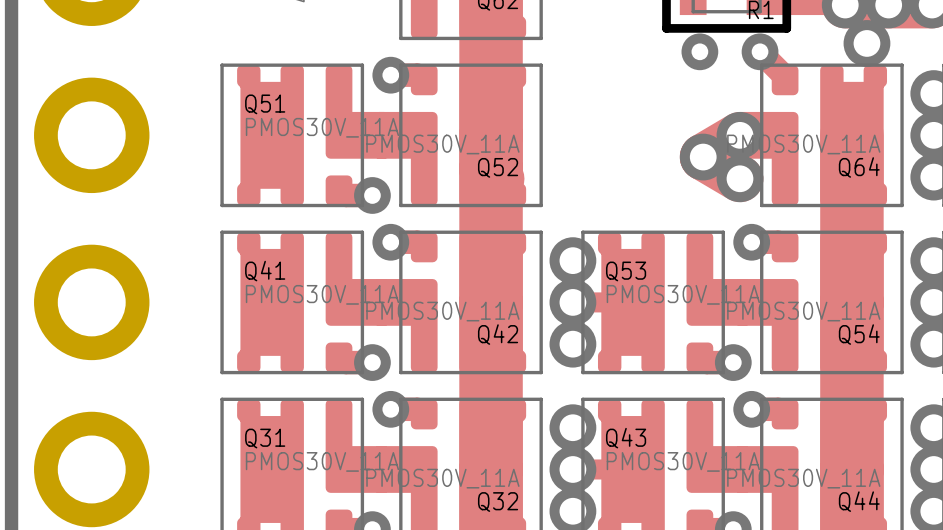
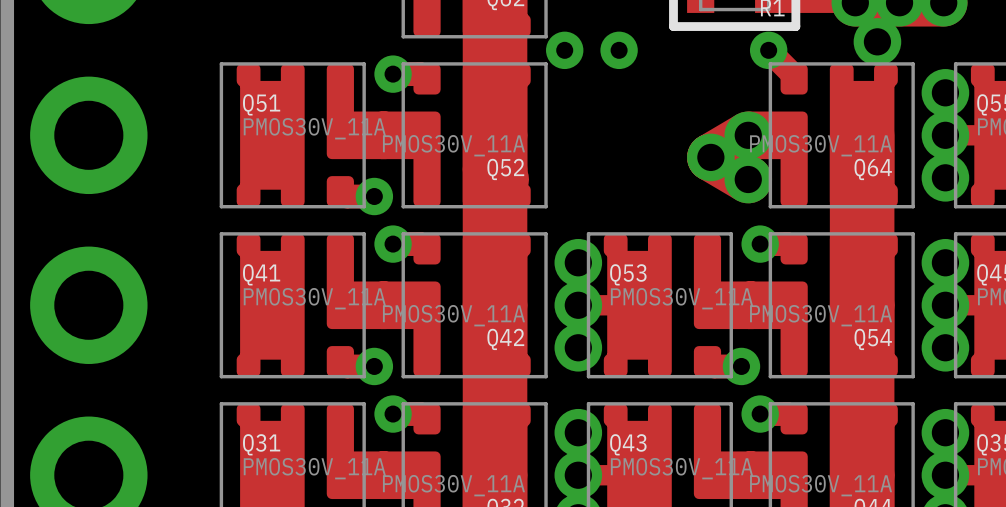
via: none -> (564, 50)
via: none -> (619, 50)
via: (699, 51) -> none

